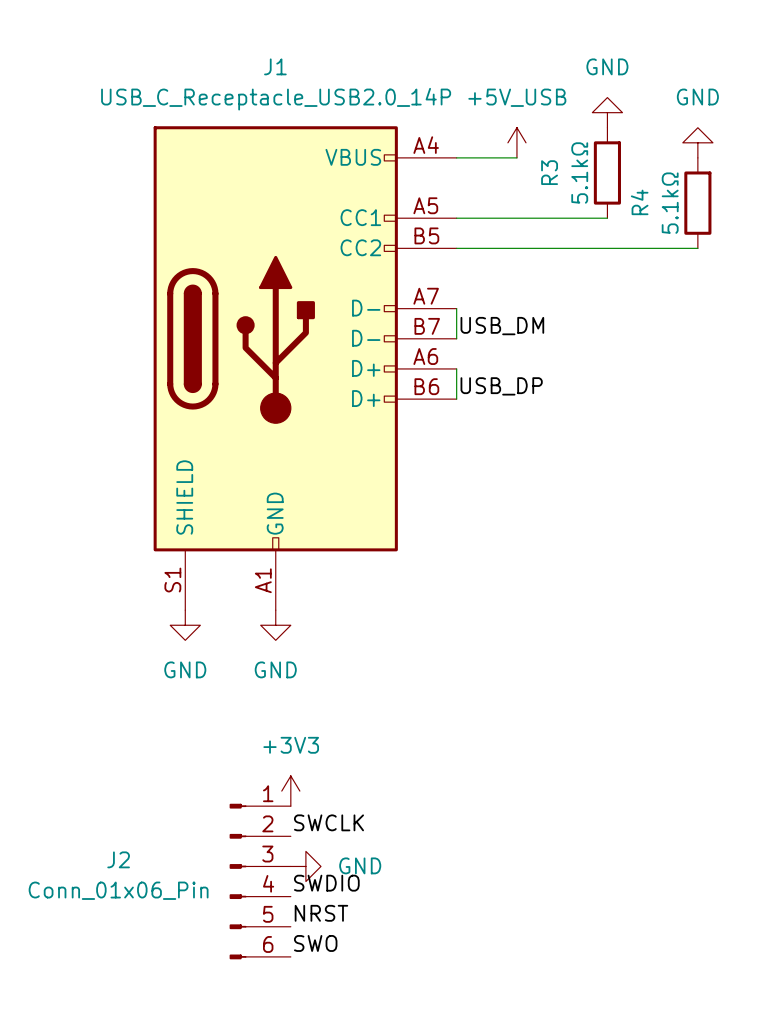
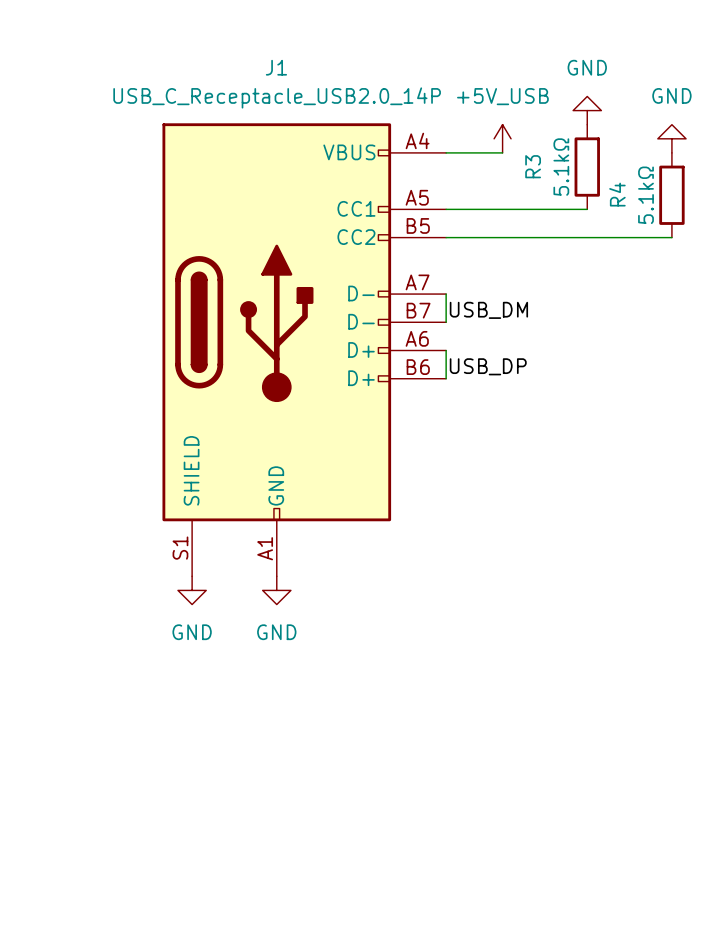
power symbol: +3V3 (290, 791) -> none
label: SWCLK (328, 822) -> none
power symbol: GND (305, 866) -> none
J2: Conn_01x06_Pin (260, 881) -> none
label: SWDIO (326, 883) -> none
label: NRST (321, 913) -> none
label: SWO (315, 943) -> none

